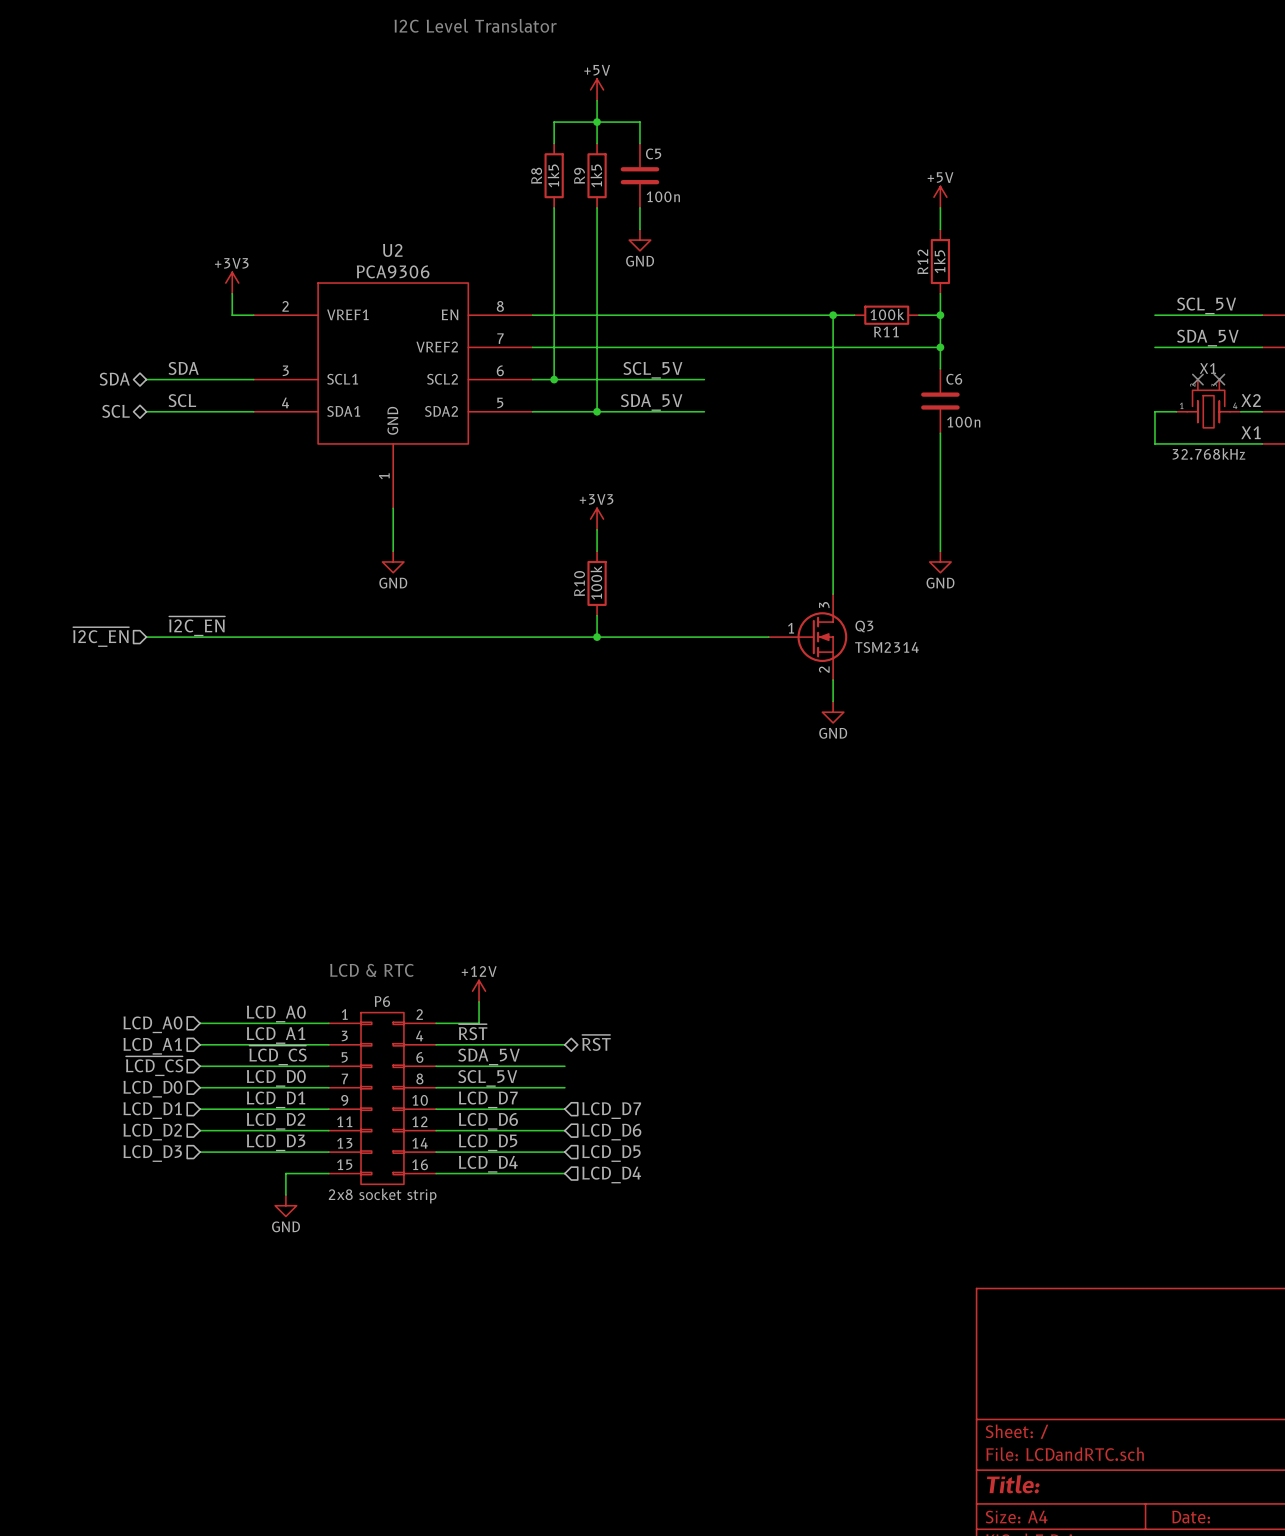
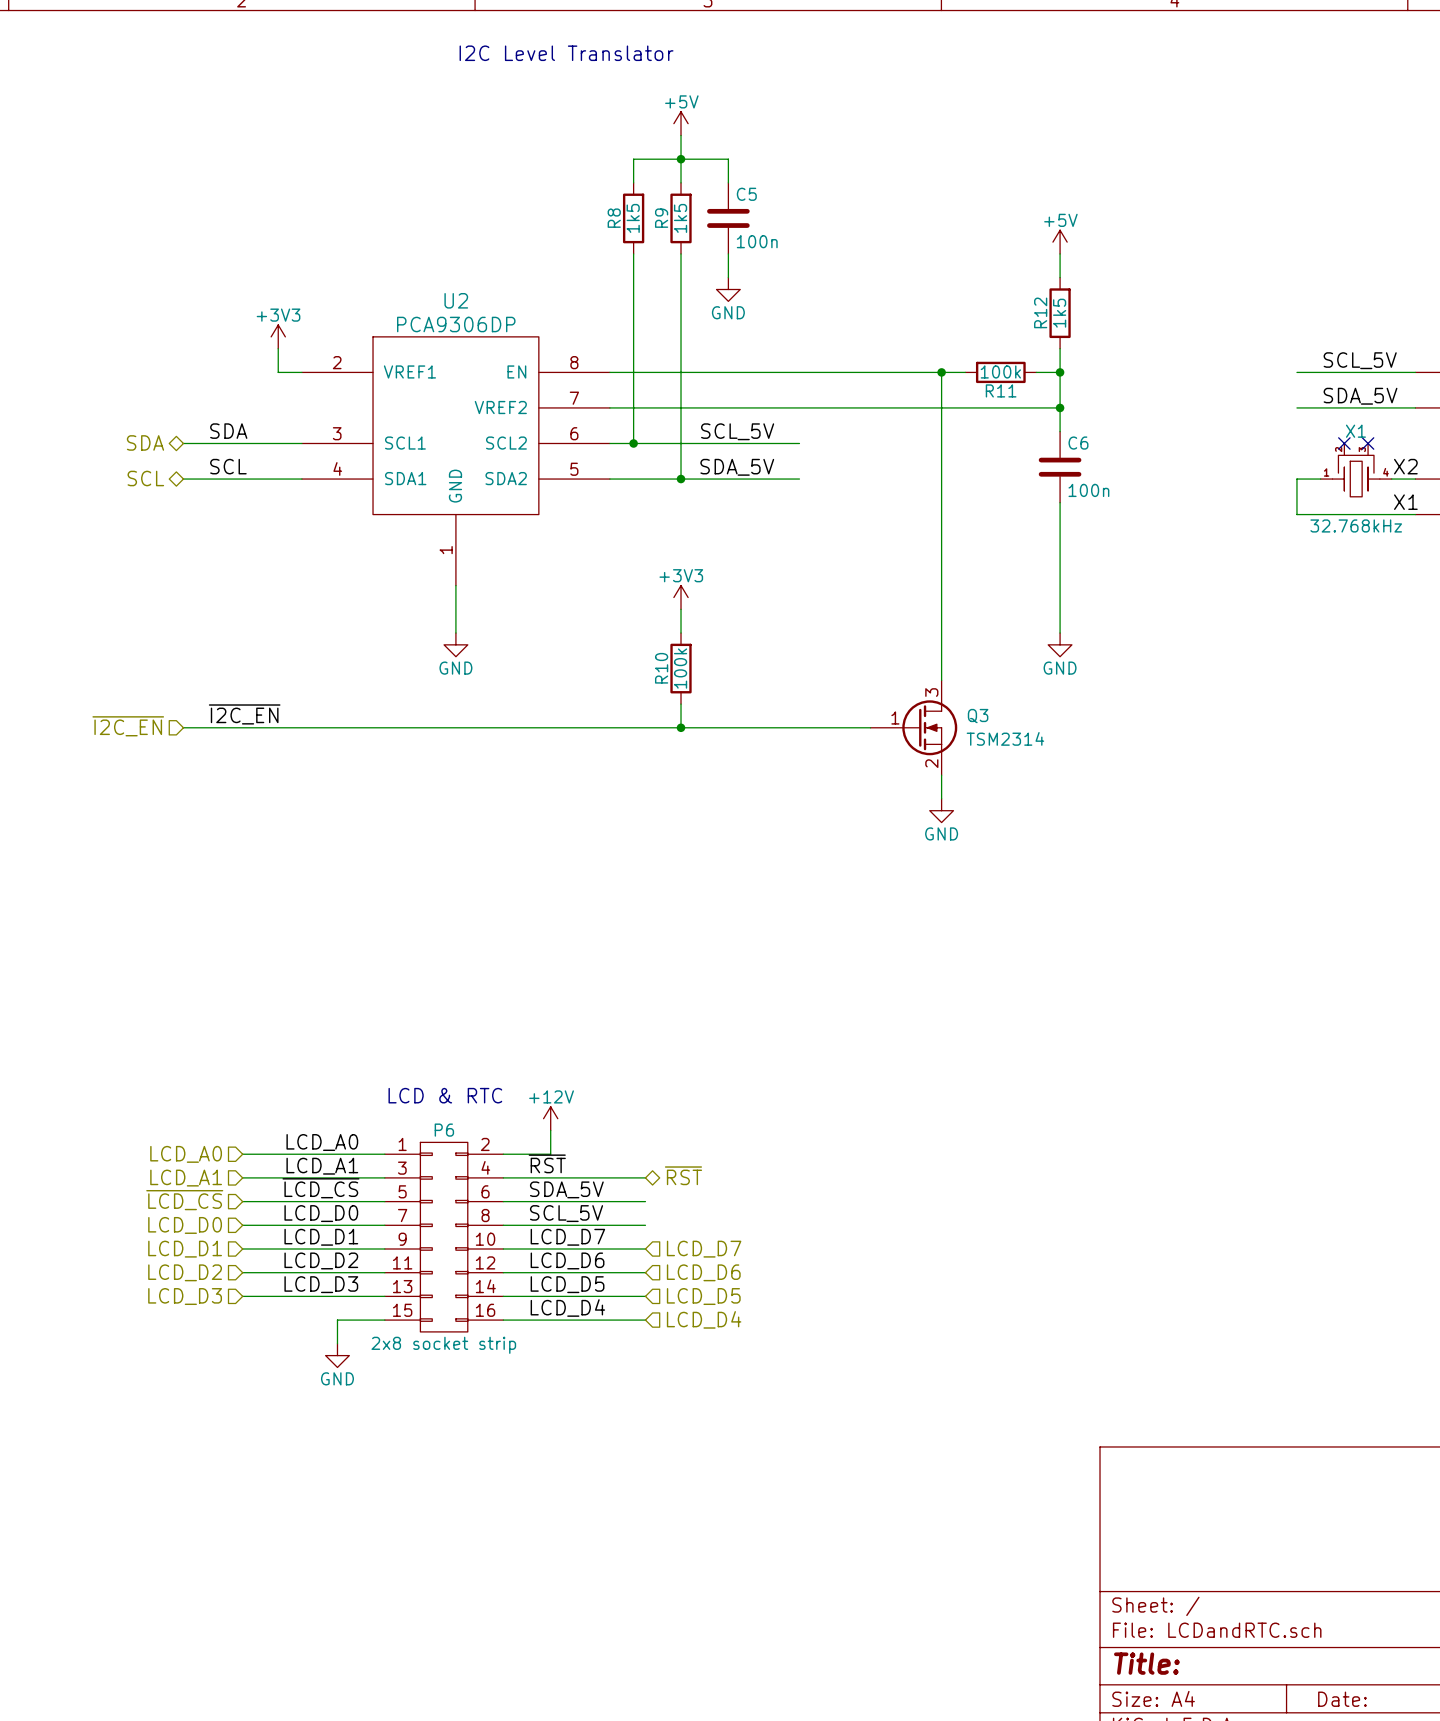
U2 value: PCA9306 (393, 271) -> PCA9306DP (456, 324)

